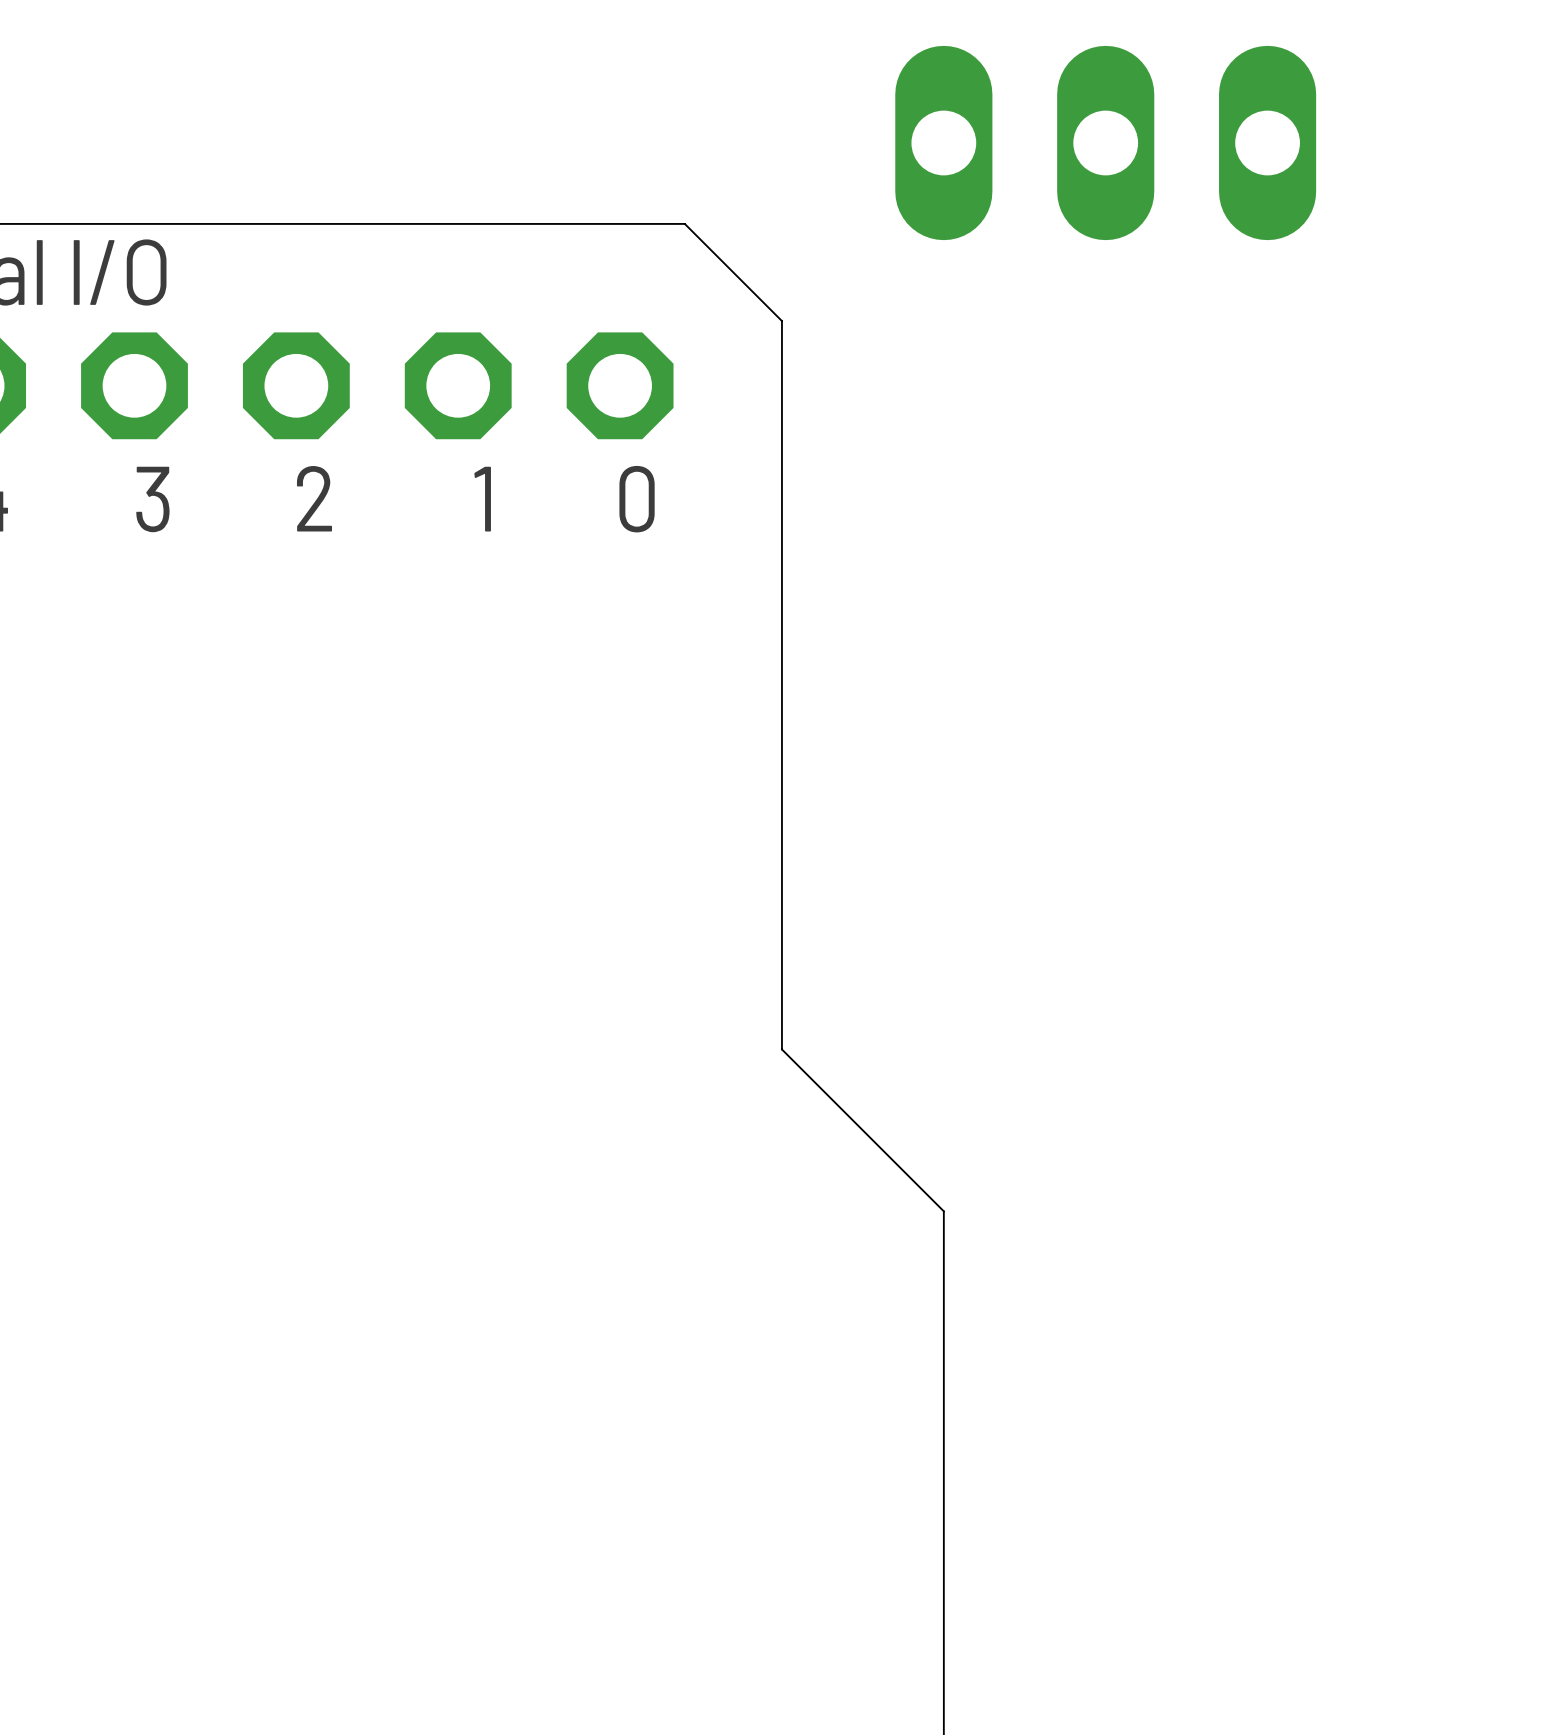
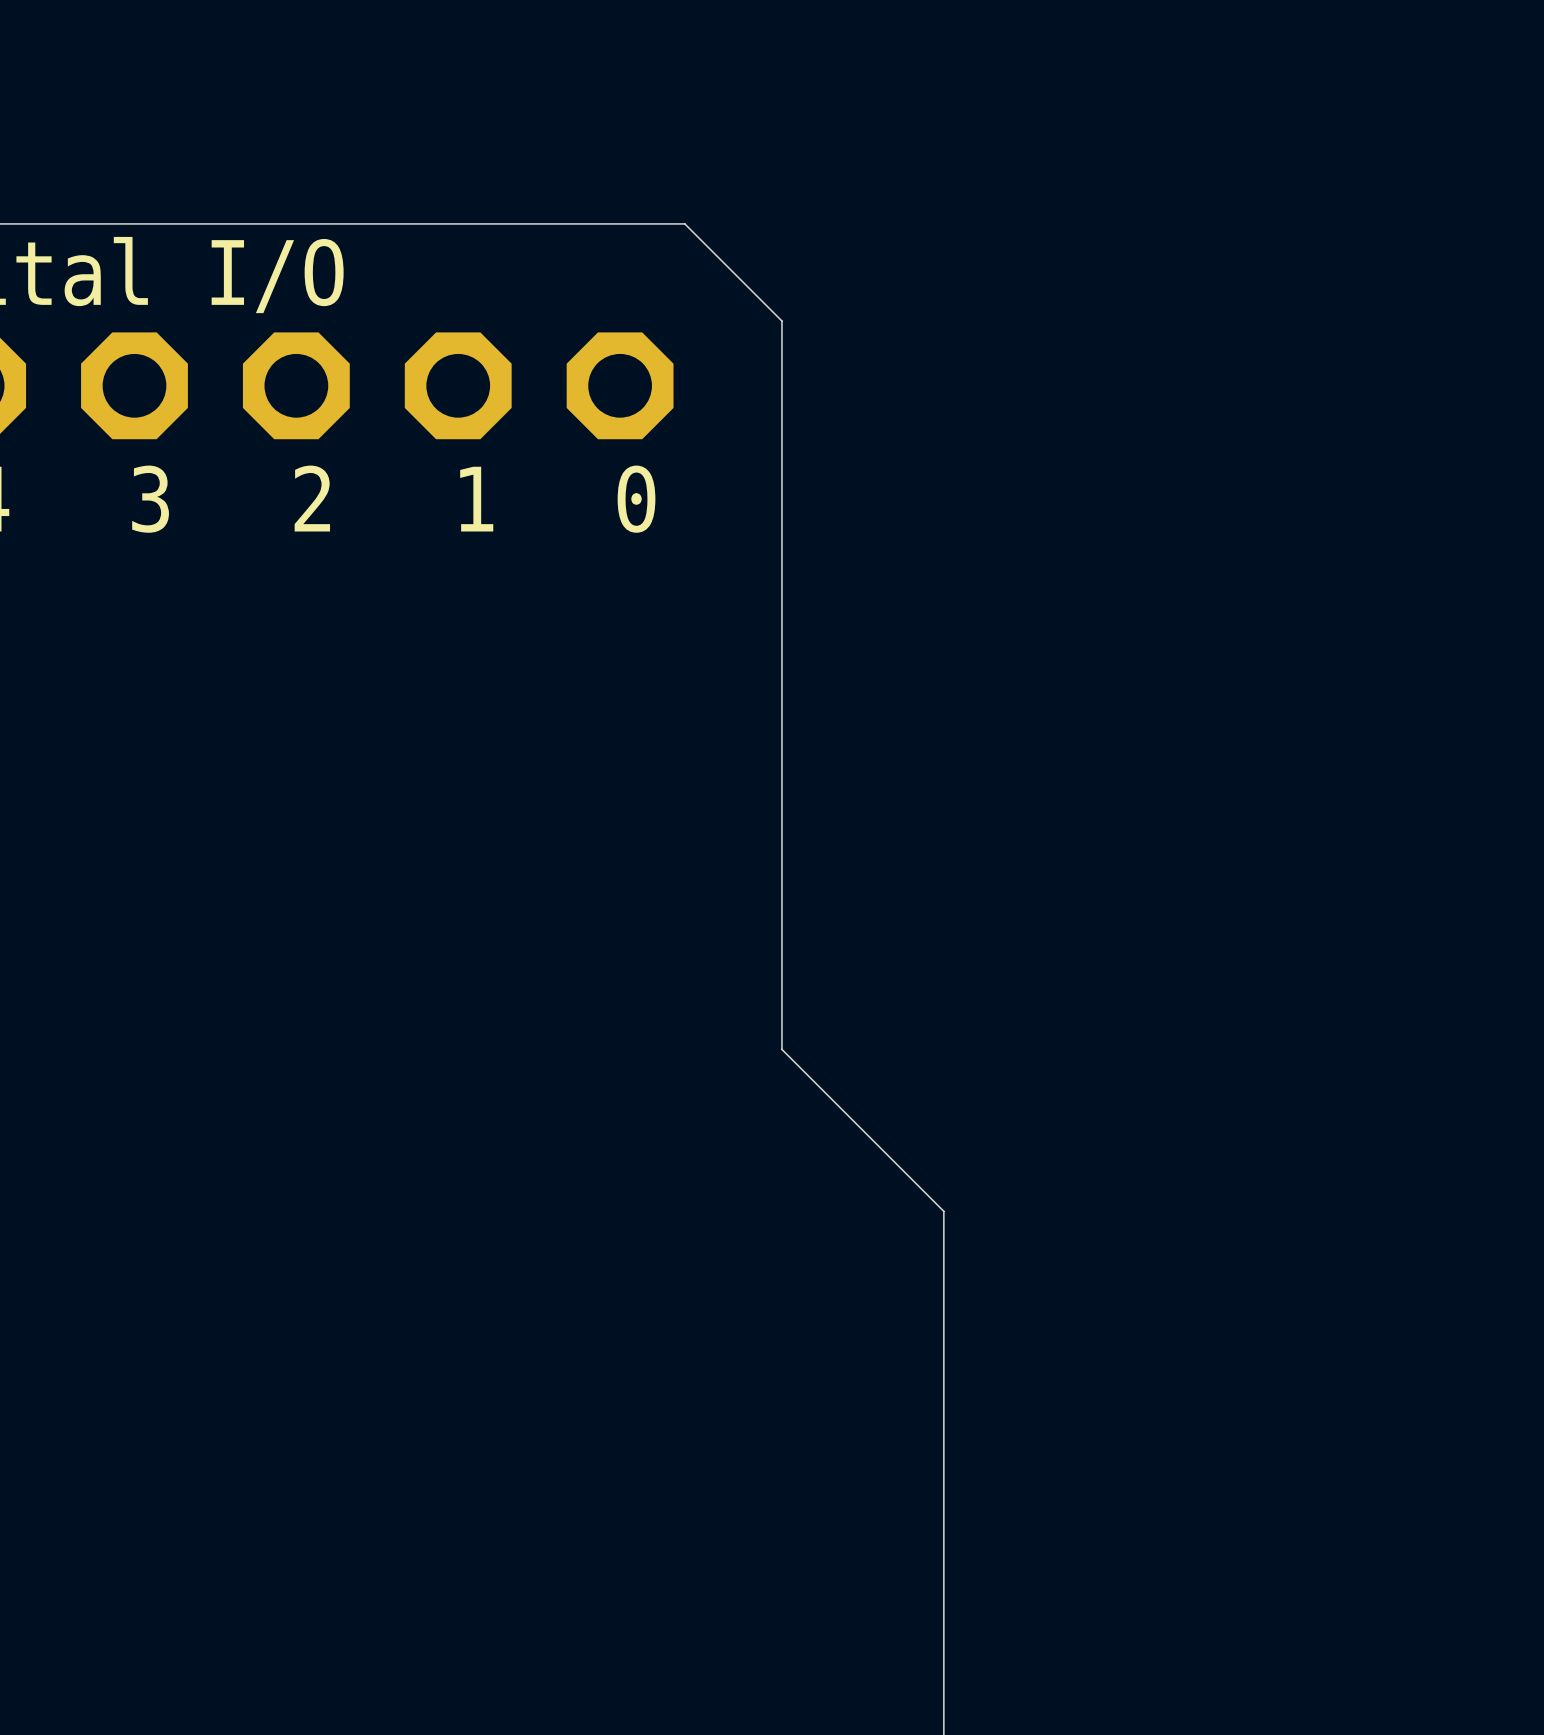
part: (1105, 143) -> none

